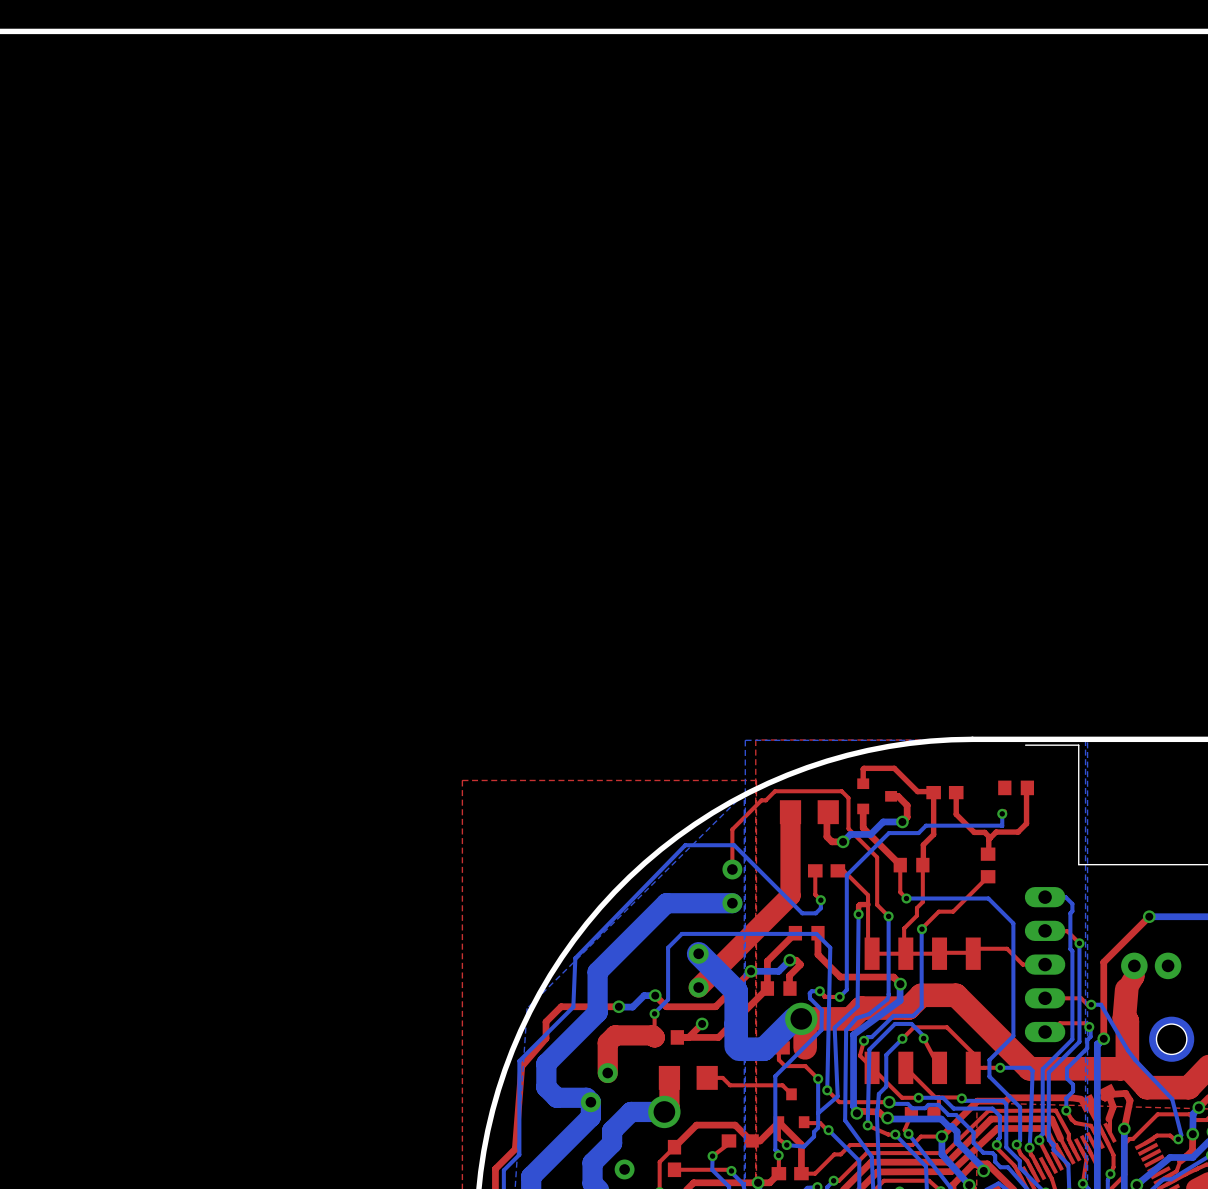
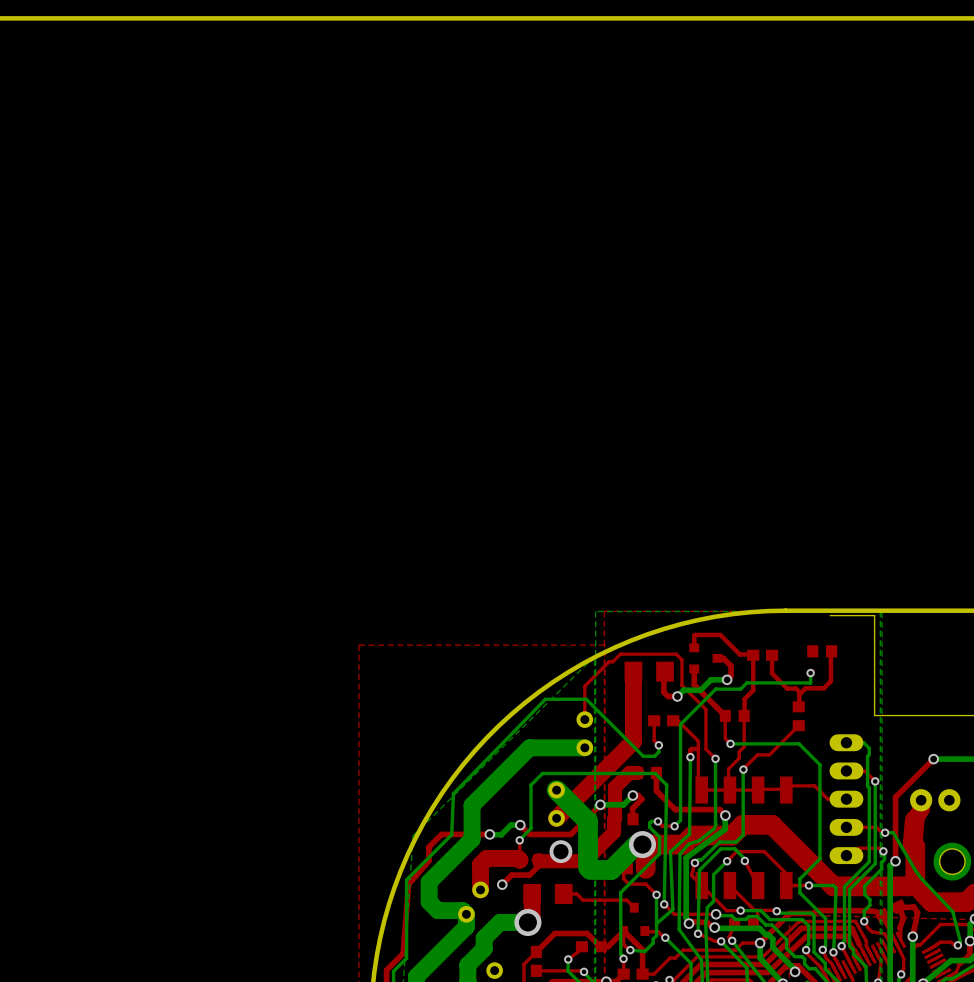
top track: (795, 933) (767, 961) (767, 988) (718, 1037) (688, 1037) (702, 1023) -> (637, 772) (629, 772) (615, 787) (614, 832) (584, 861) (538, 860) (538, 865) (529, 875) (511, 875) (502, 884)
via size: [695, 1017, 709, 1031] -> [549, 840, 573, 864]
via: none -> (502, 884)

